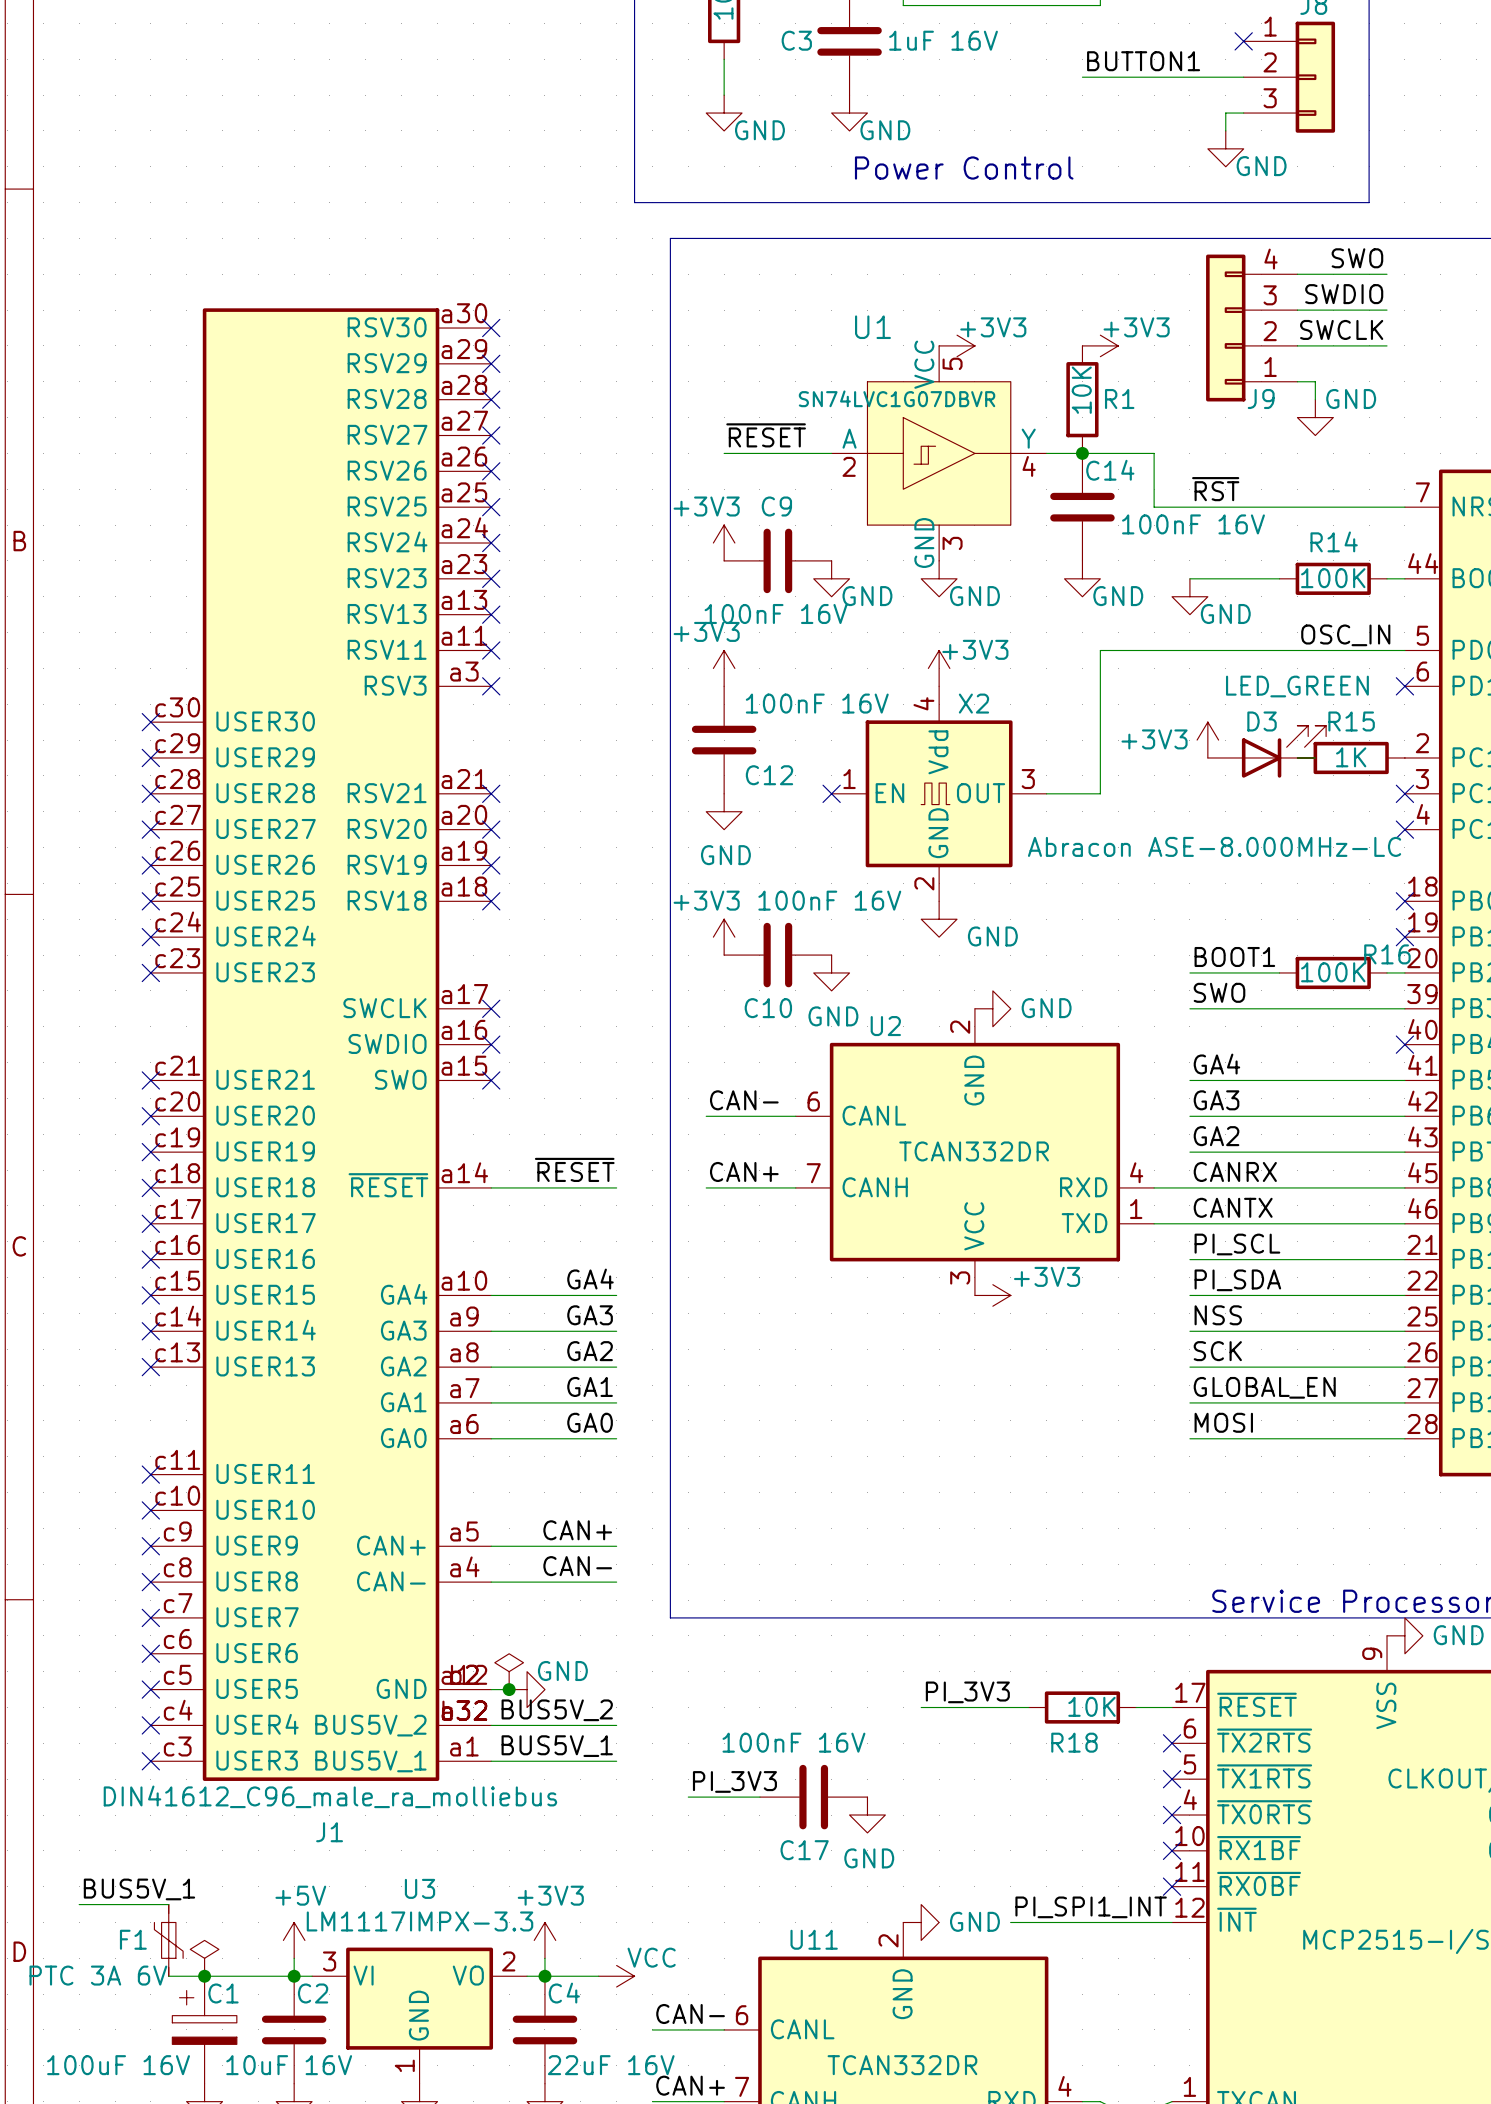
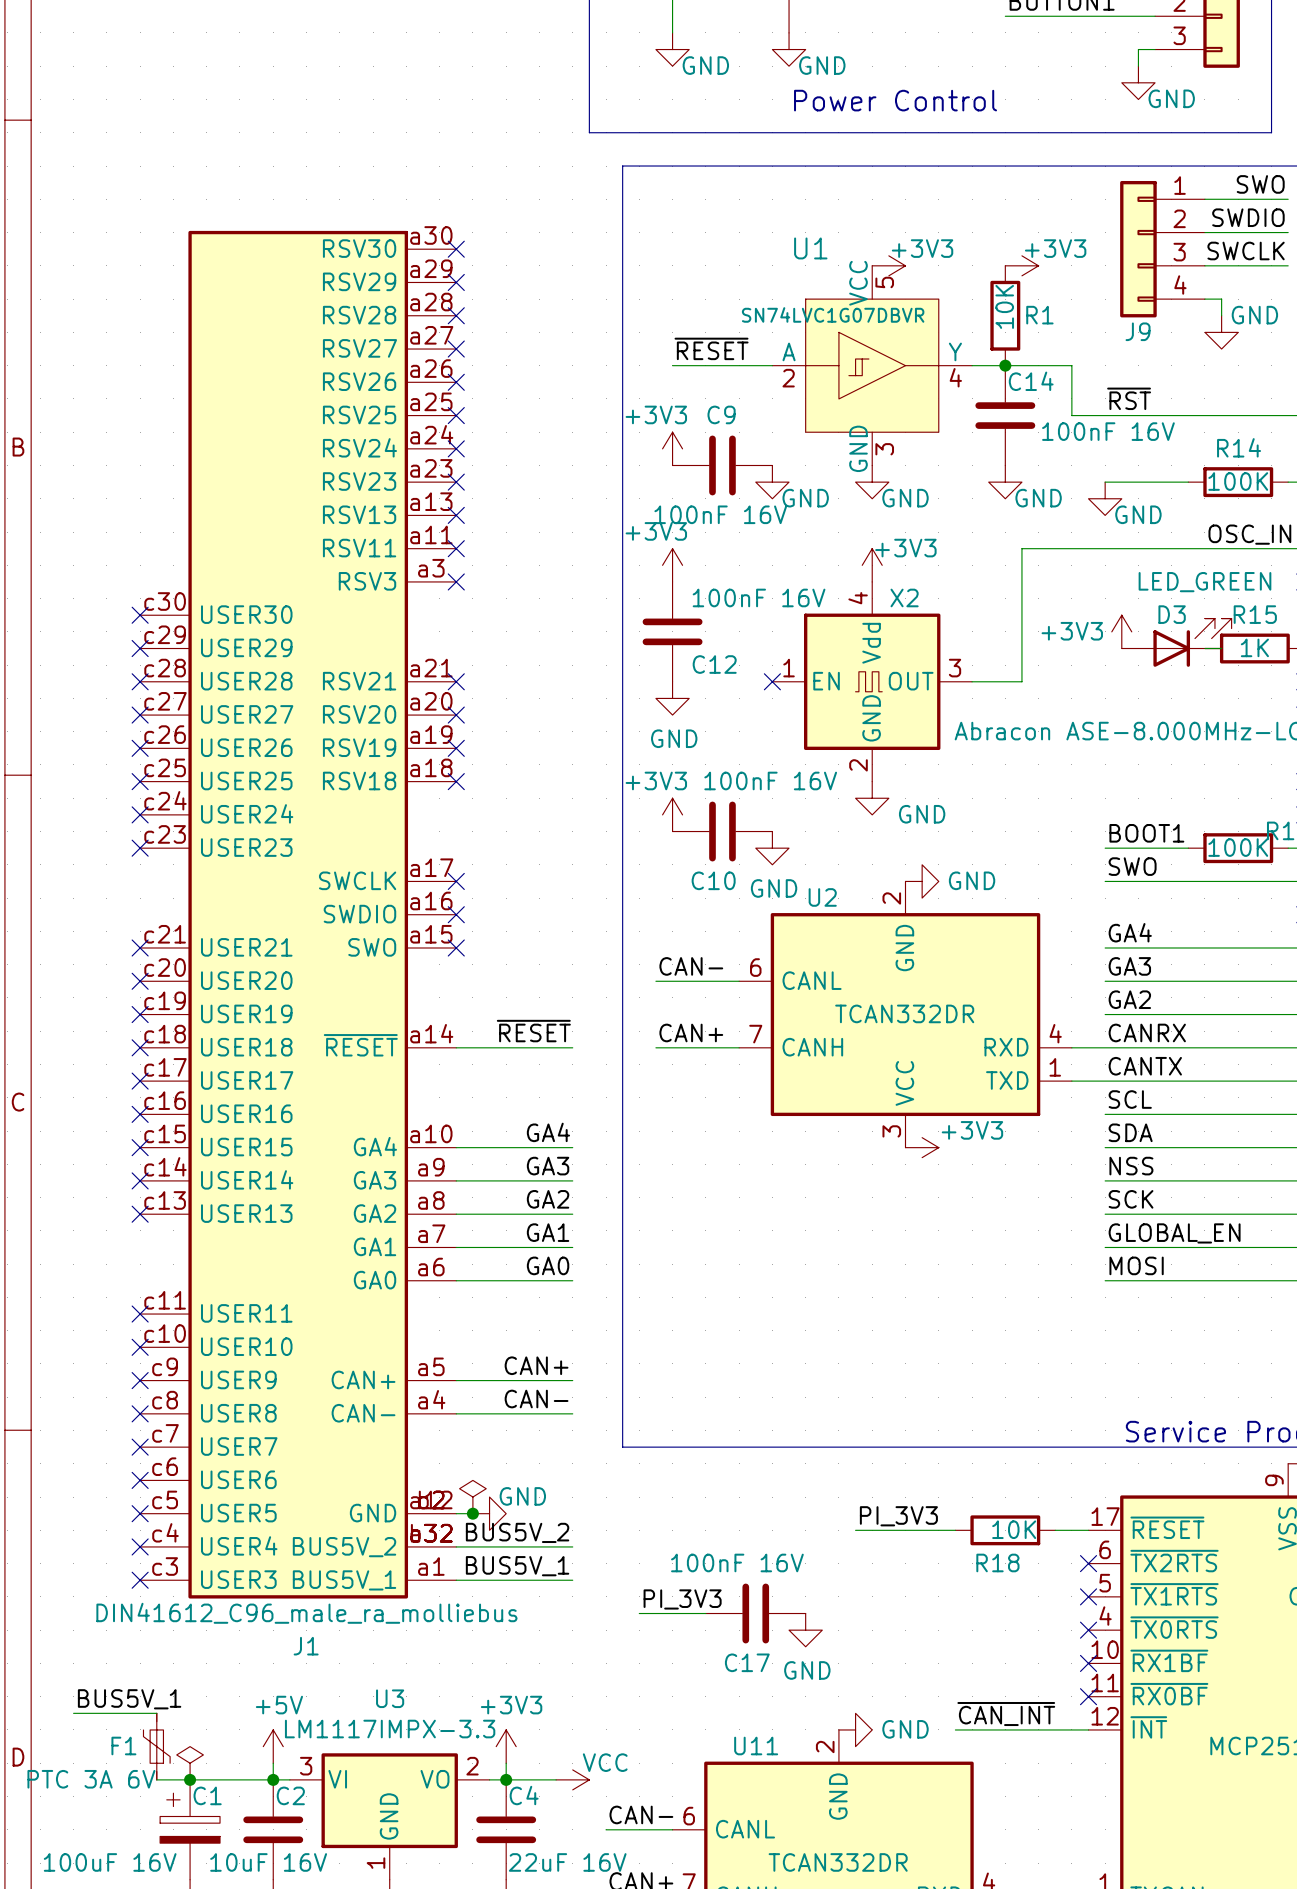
J9 flip: as is (1225, 328) -> up-down (1138, 249)
J9 name position: J9 (1261, 399) -> J9 (1138, 331)
label: PI_SCL (1237, 1244) -> SCL (1130, 1099)
label: PI_SDA (1237, 1280) -> SDA (1130, 1132)
label: none -> ~{CAN_INT} (1006, 1714)
label: PI_SPI1_INT (1091, 1907) -> none
wire: (1010, 1922) (1028, 1922) -> none

